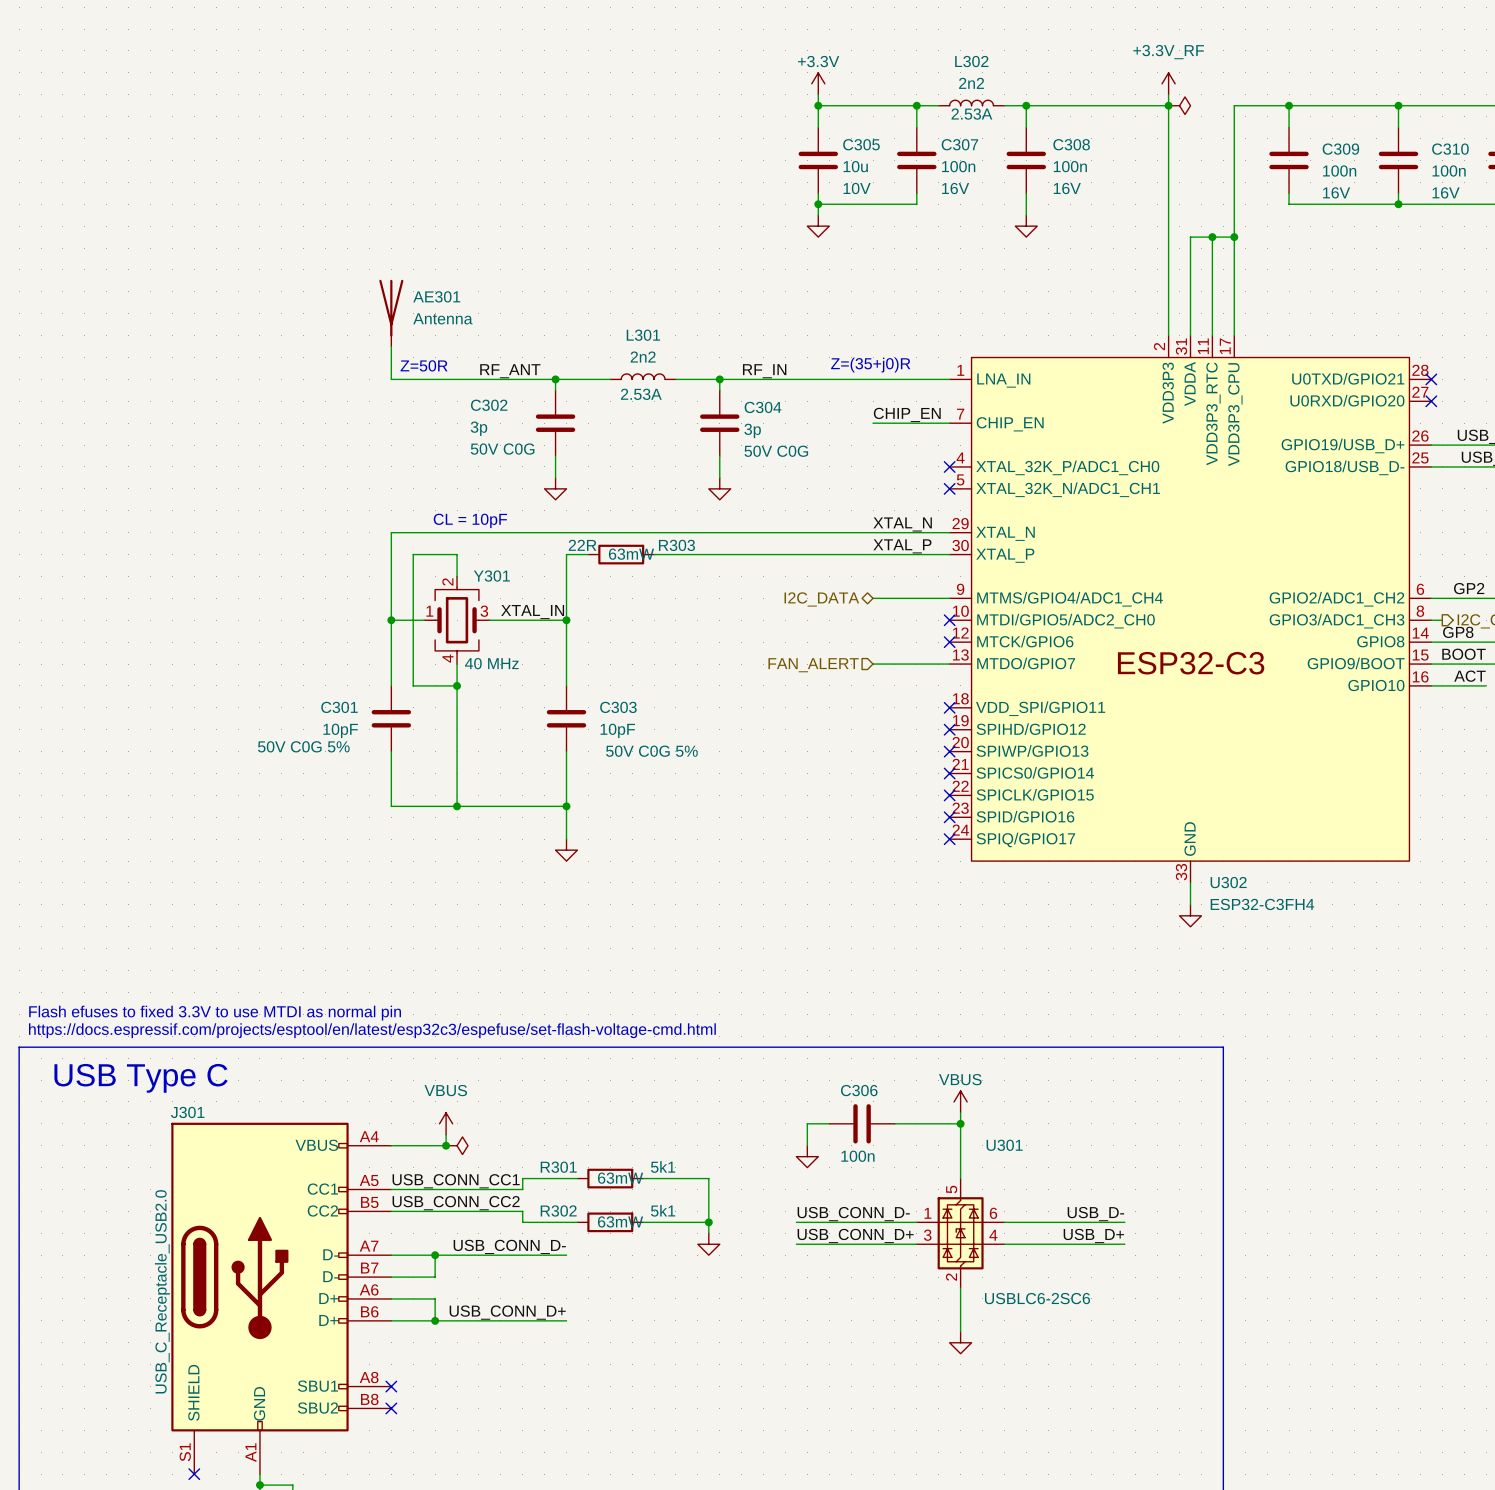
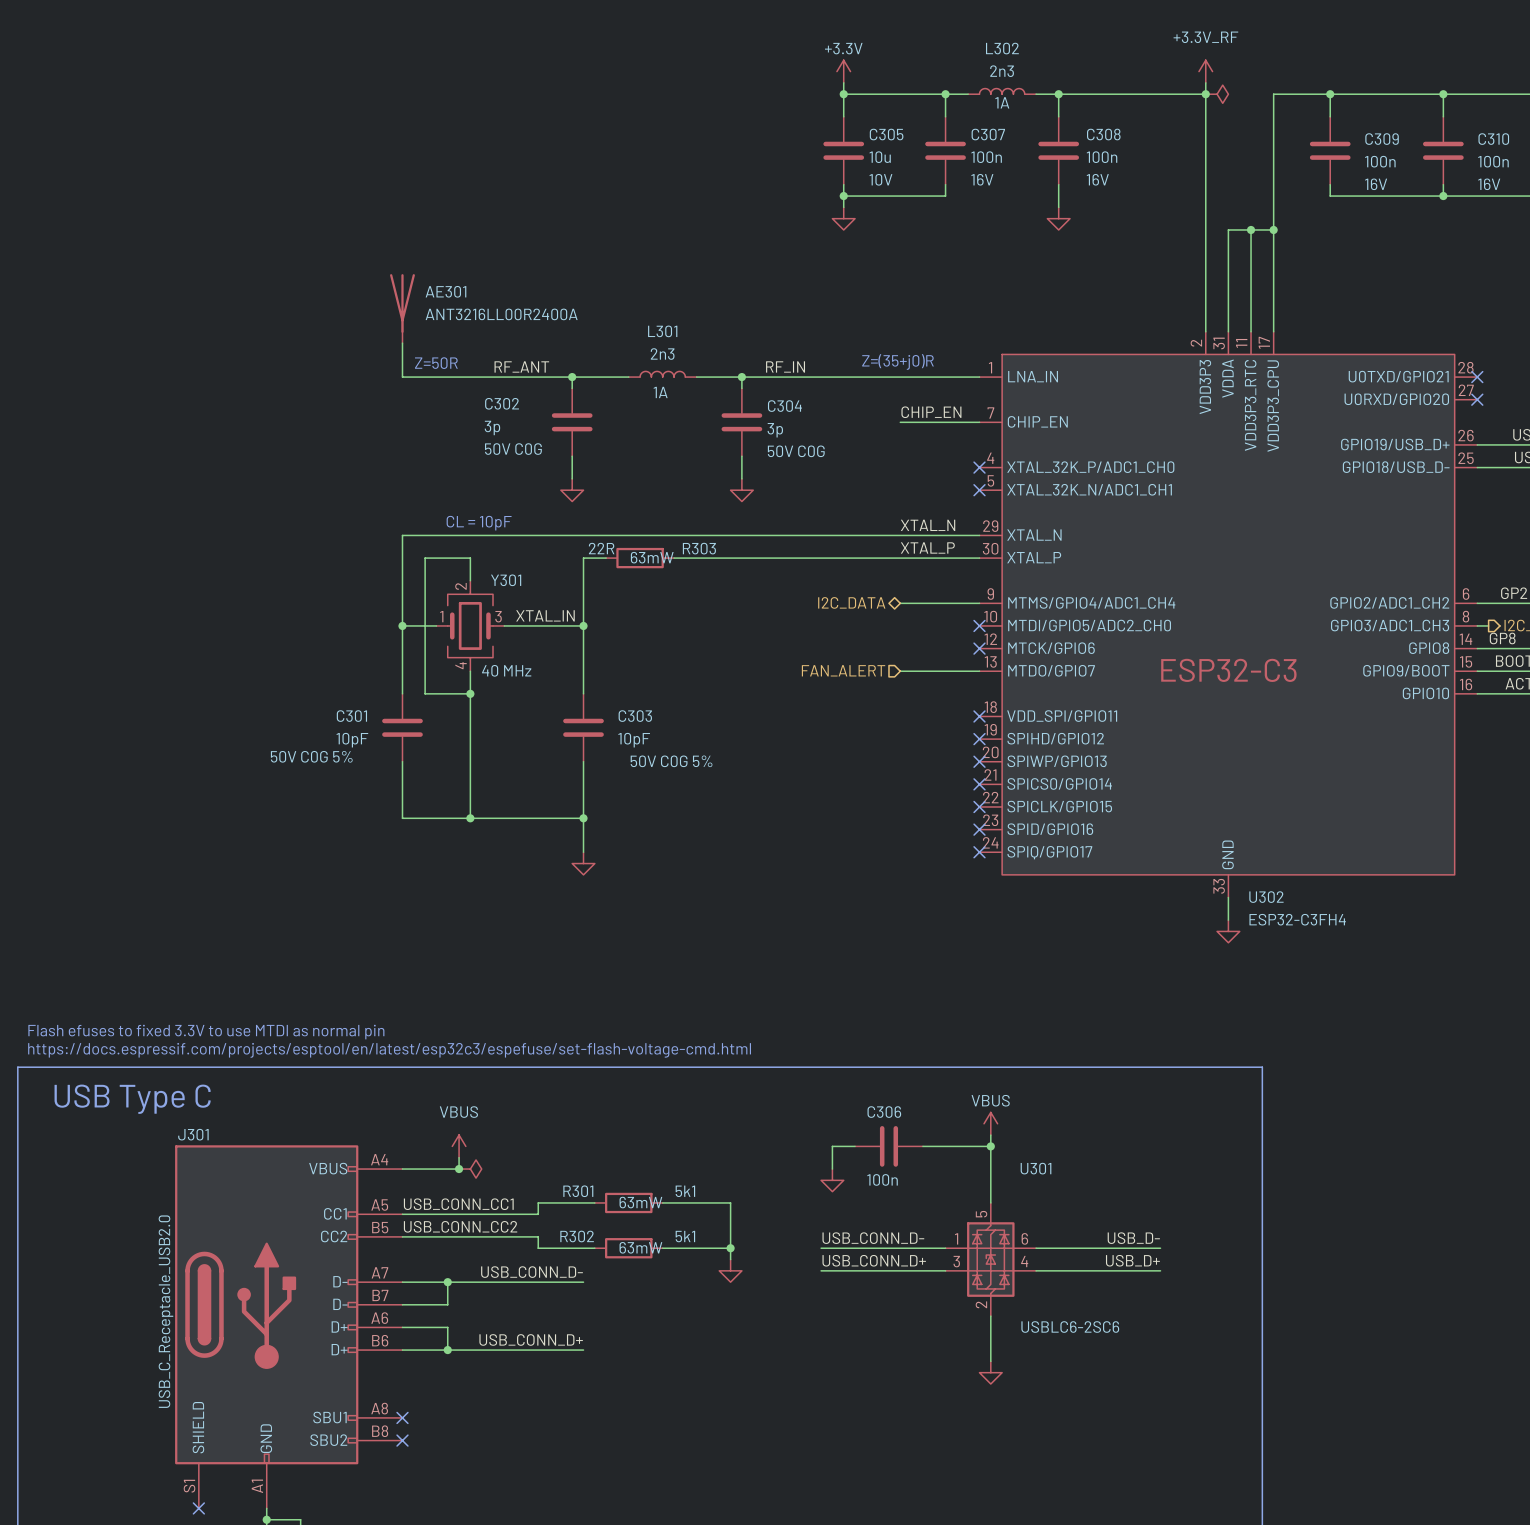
L302 value: 2n2 (971, 83) -> 2n3 (1002, 71)
L302 text: 2.53A (971, 114) -> 1A (1002, 102)
AE301 value: Antenna (442, 318) -> ANT3216LL00R2400A (501, 314)
L301 value: 2n2 (643, 357) -> 2n3 (662, 354)
L301 text: 2.53A (641, 394) -> 1A (660, 392)

